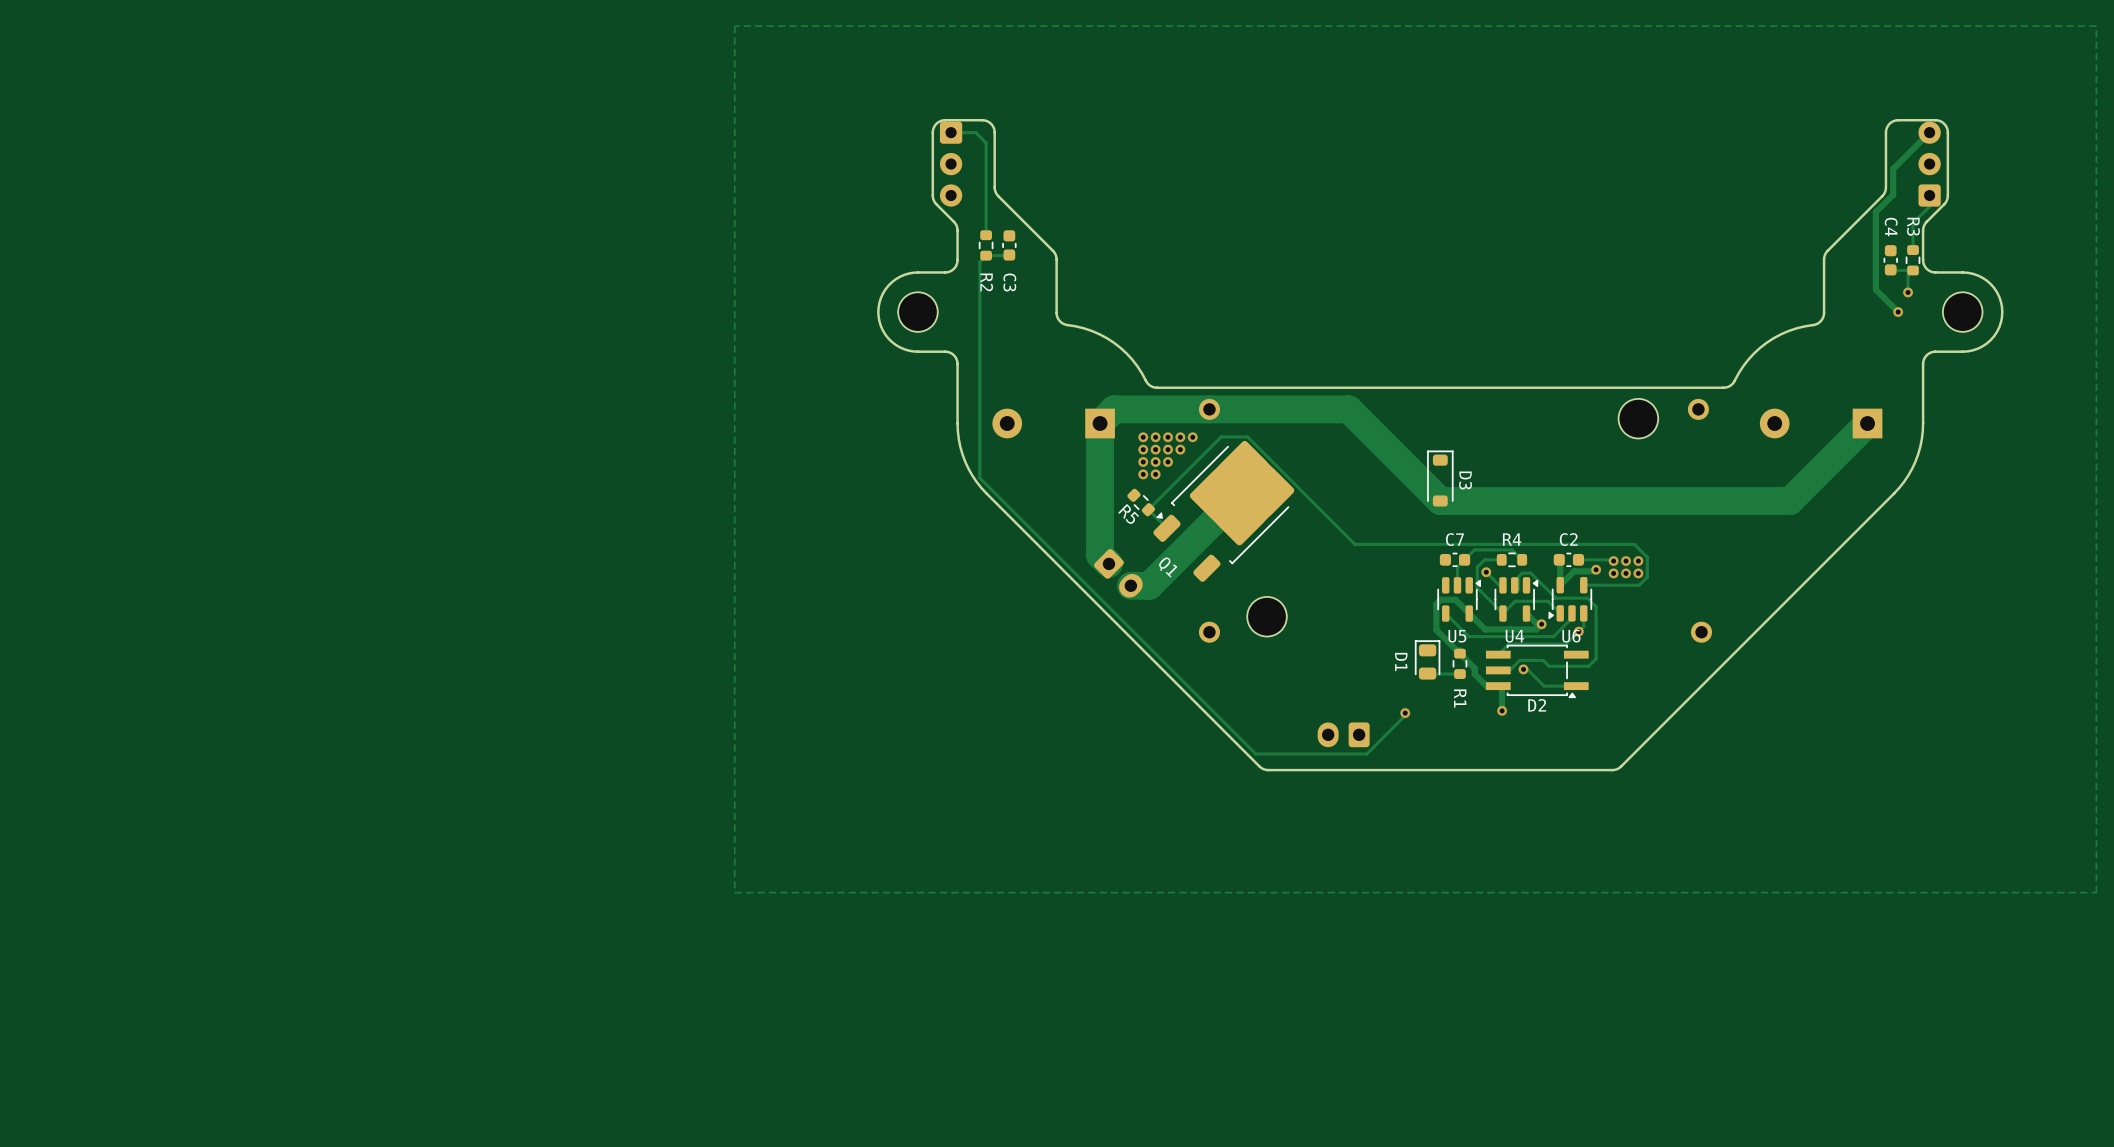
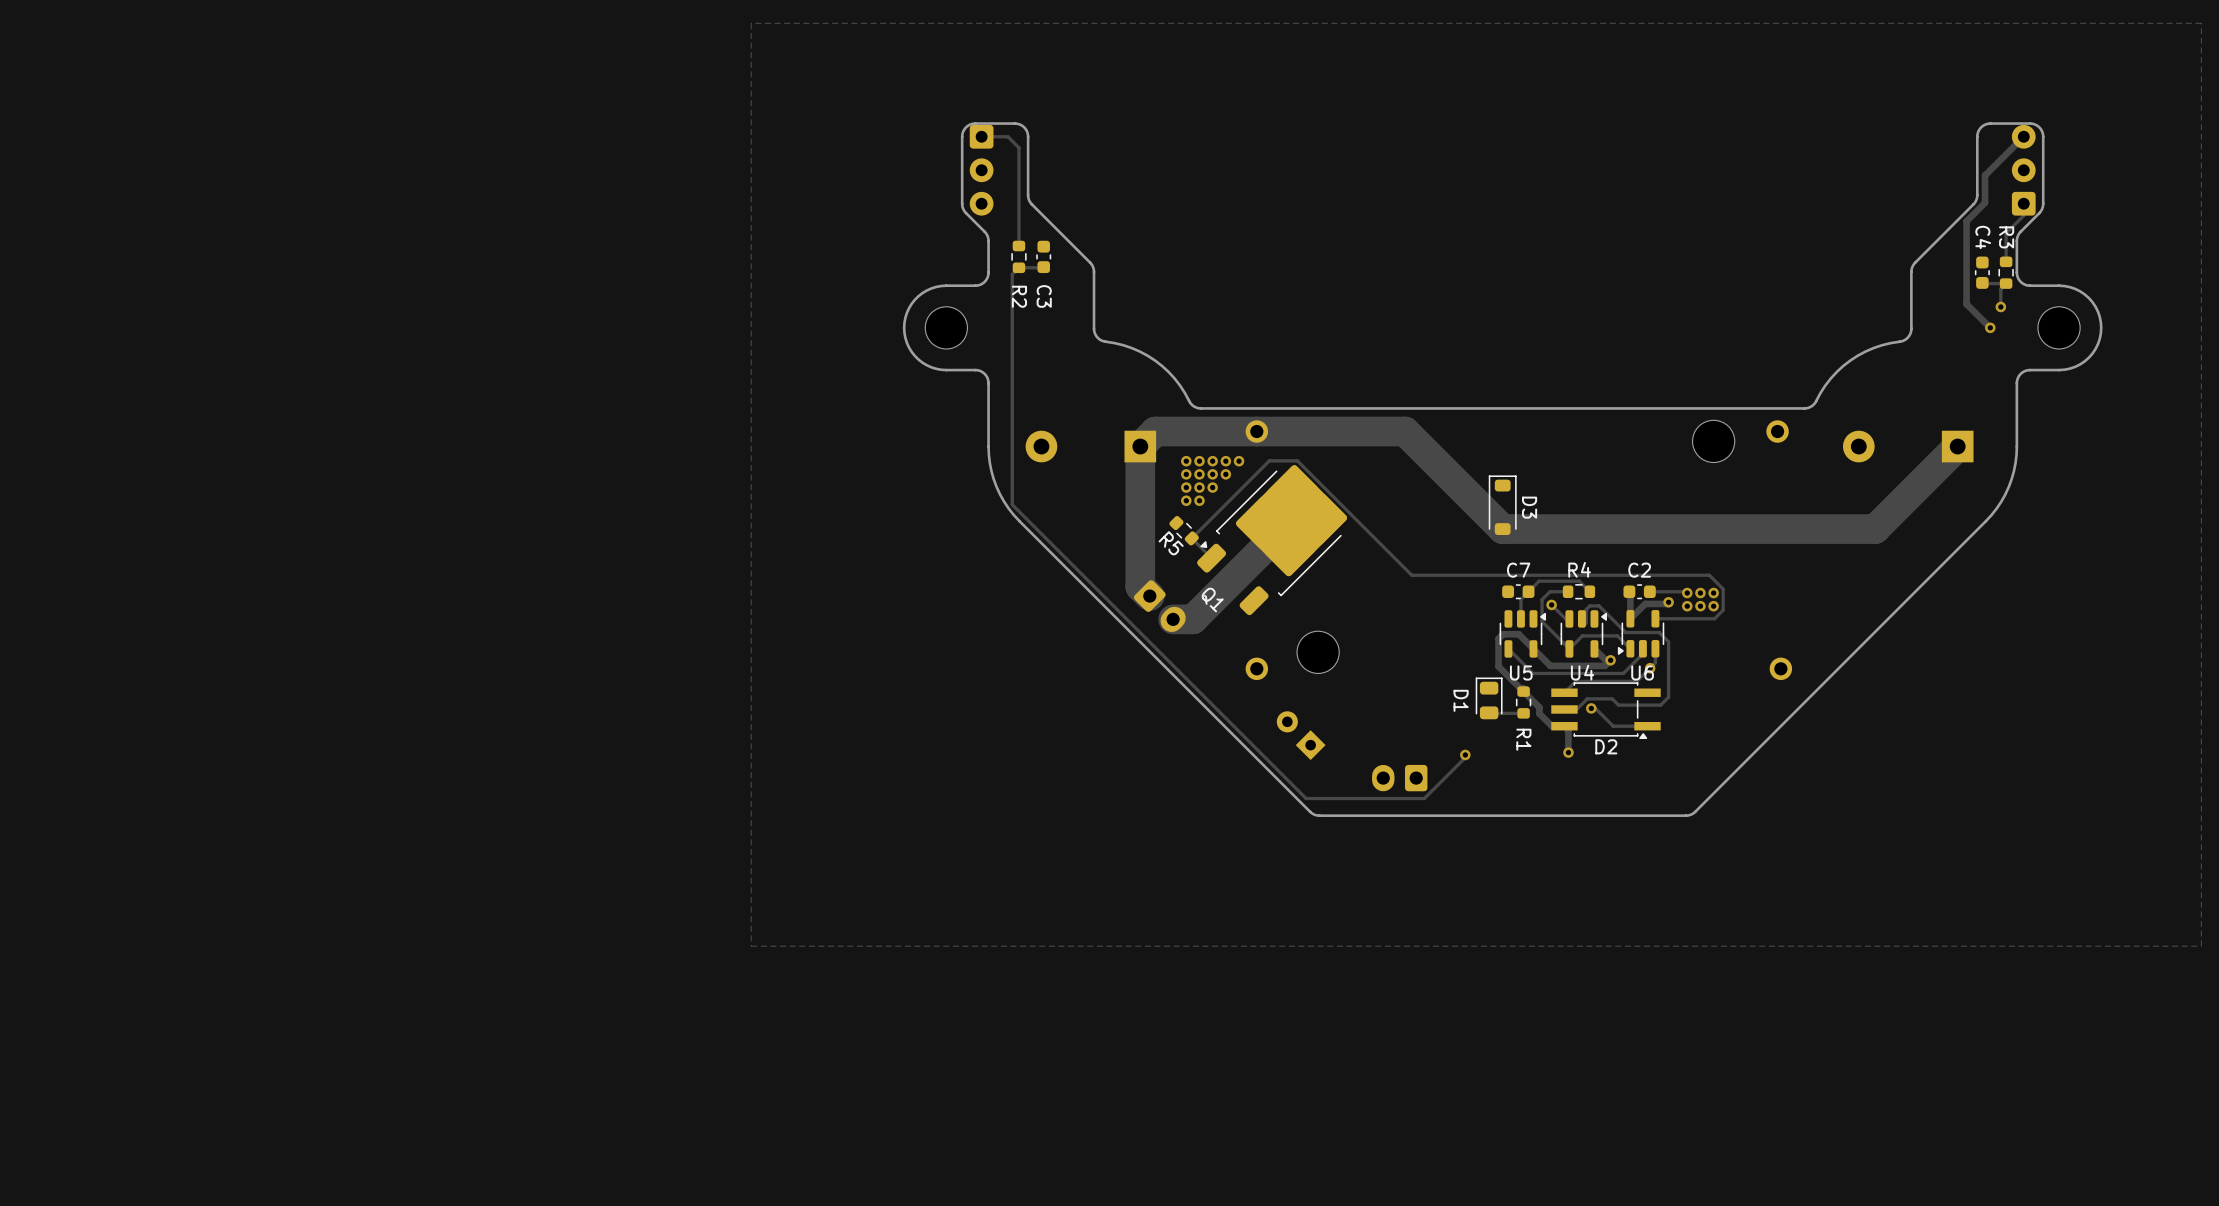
part: none -> (1301, 735)

